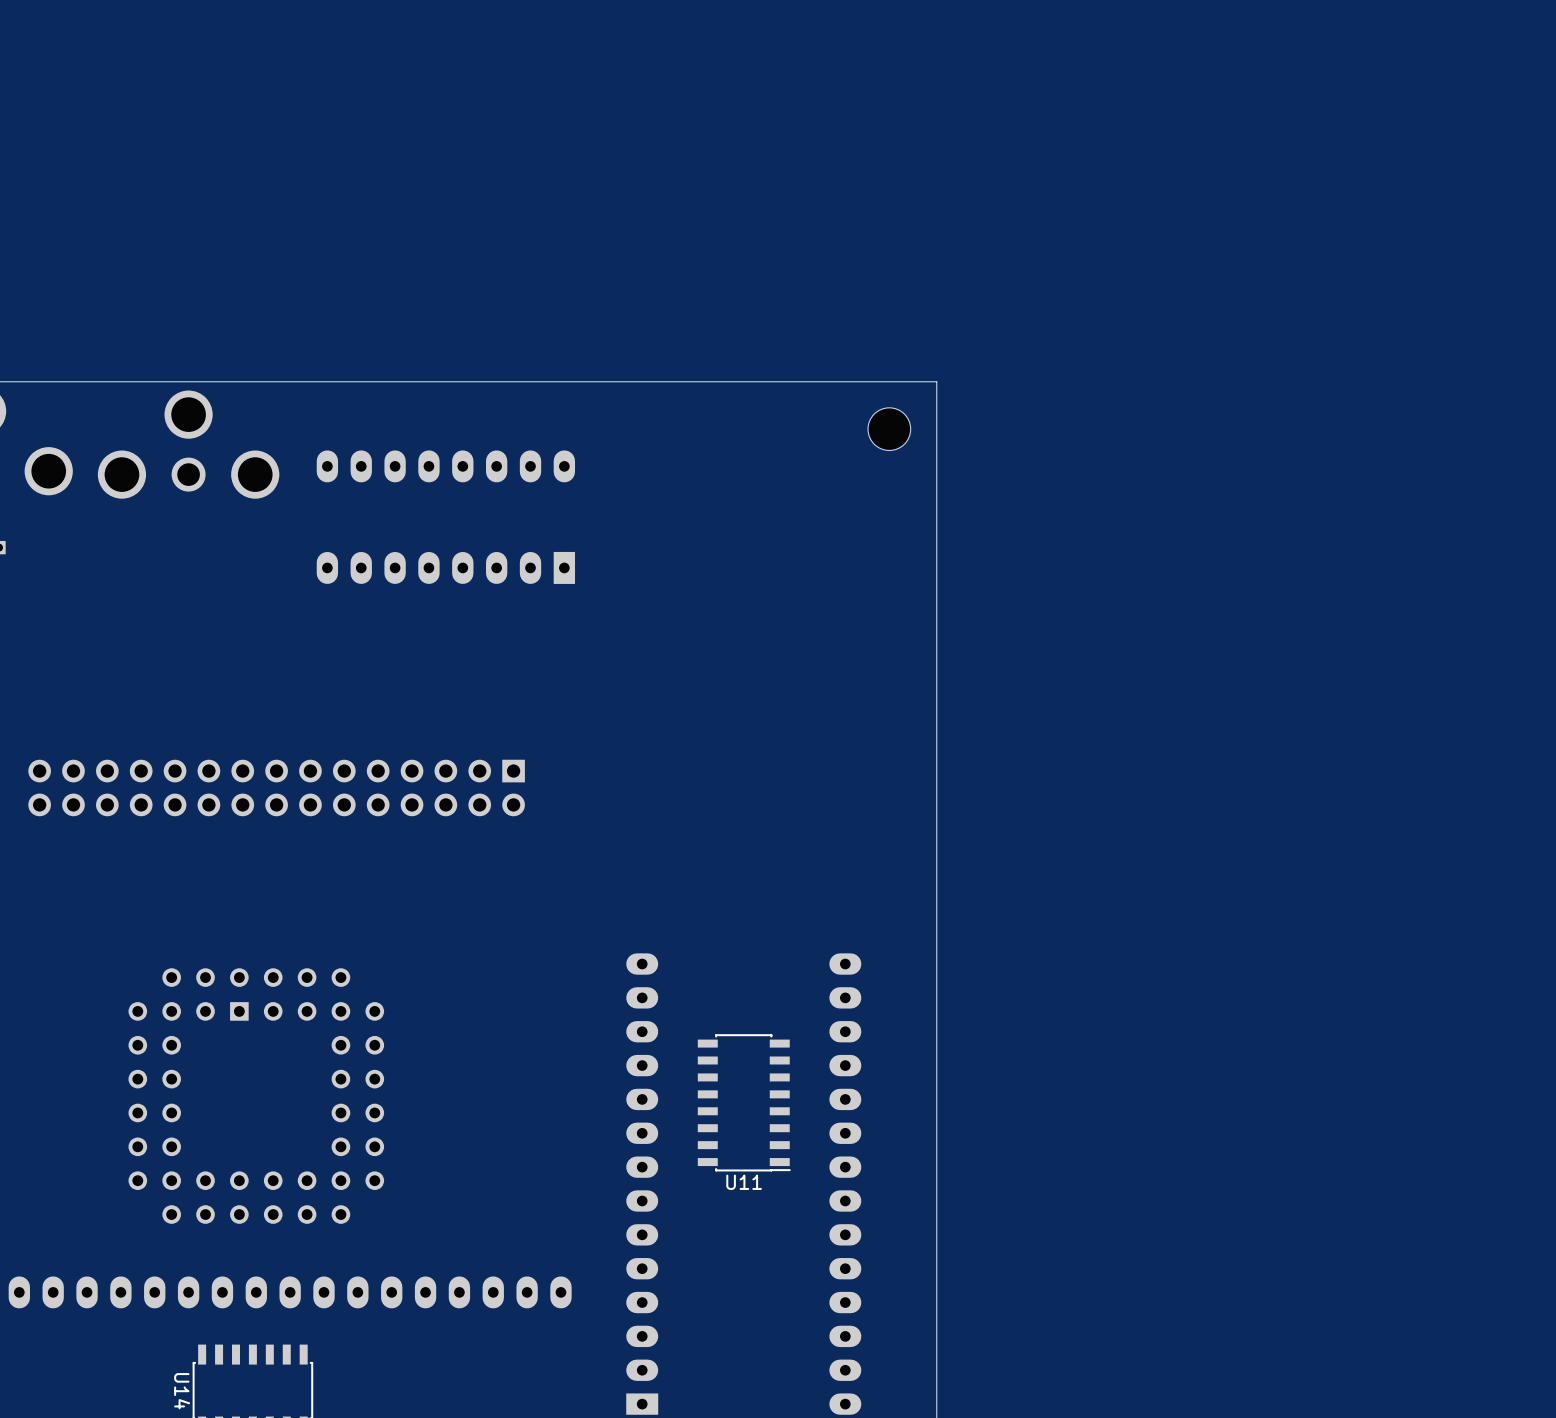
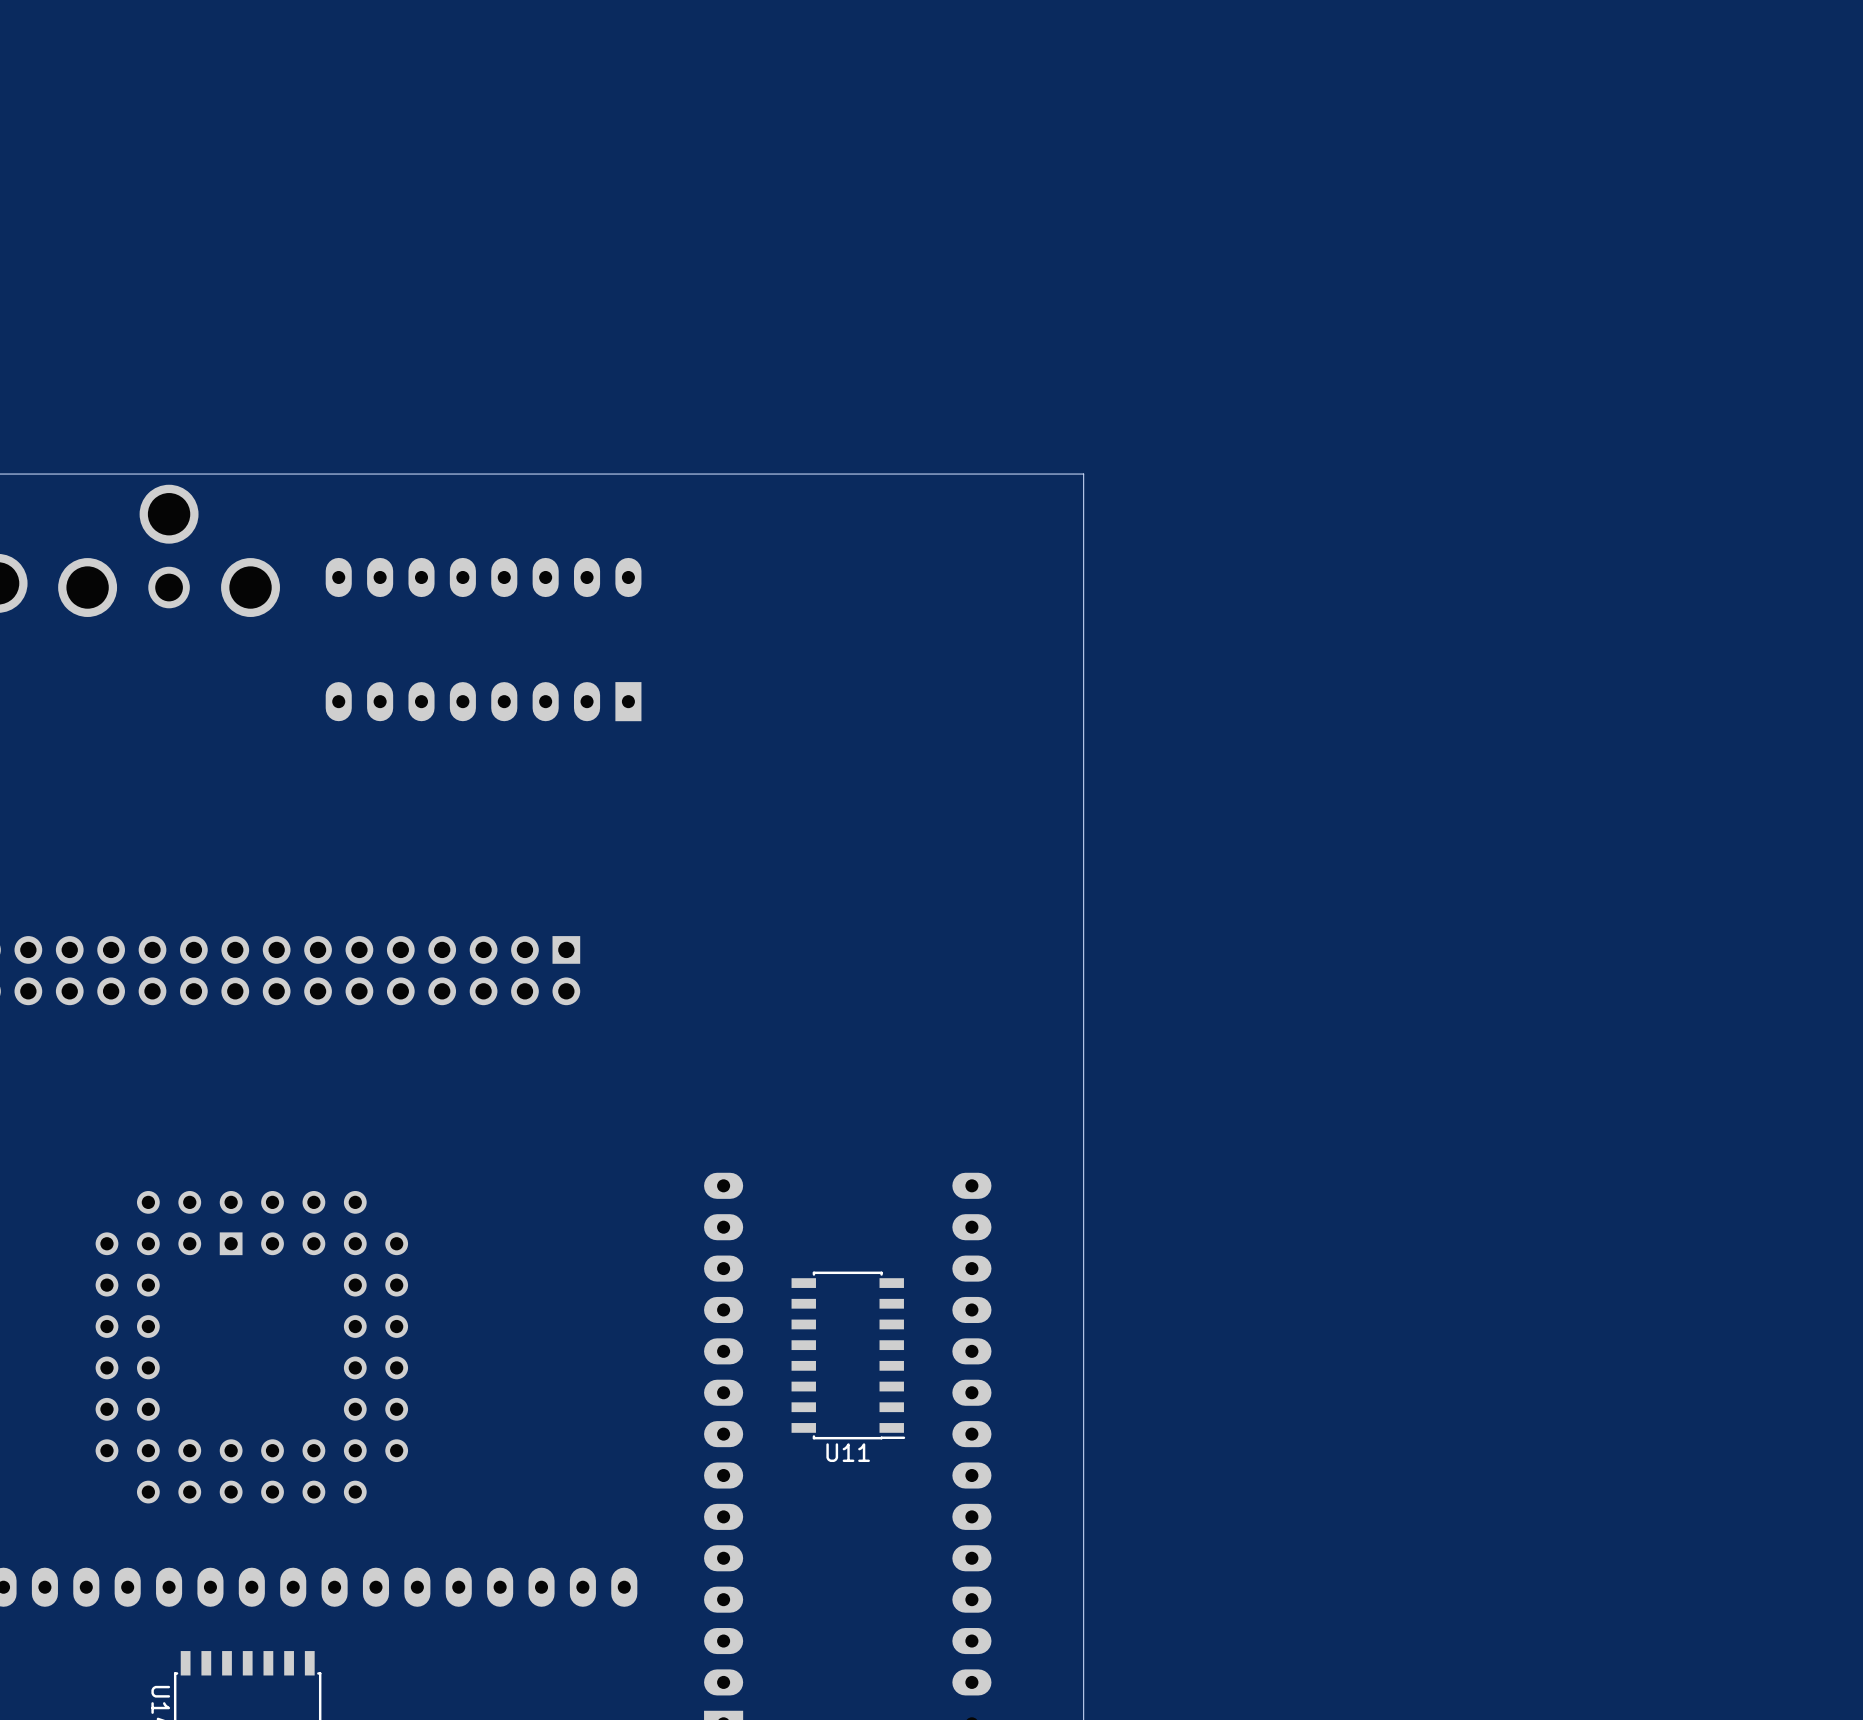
part: (889, 429) -> none

